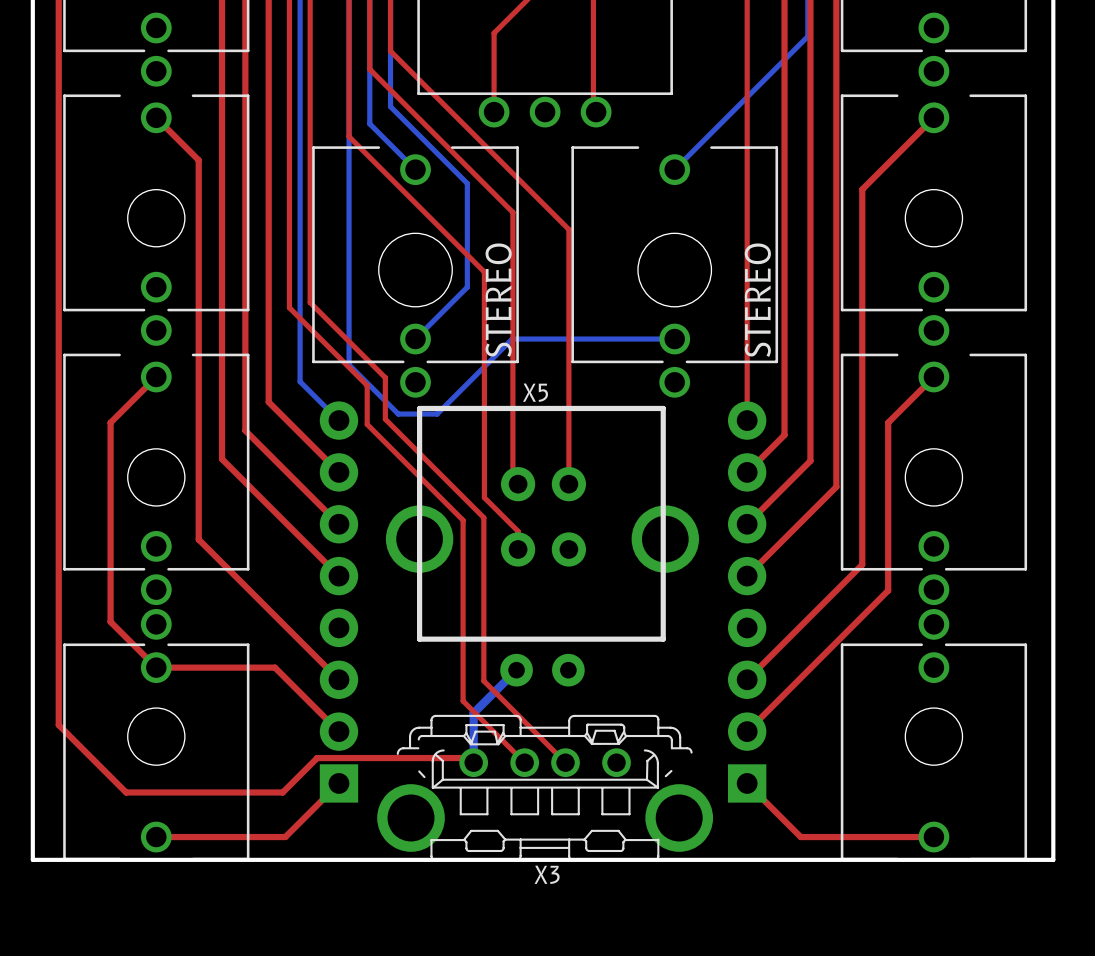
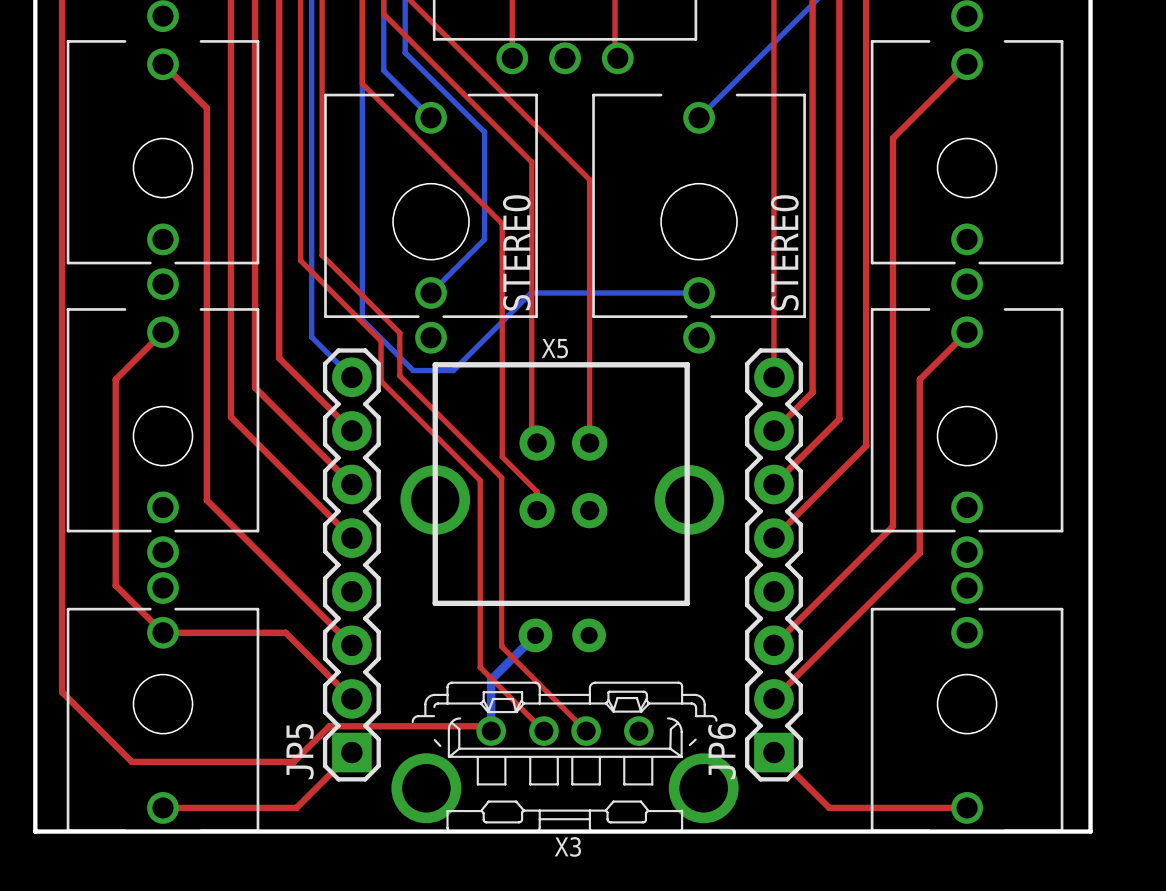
JP5 side: bottom (338, 602) -> top (351, 564)
JP6 side: bottom (747, 602) -> top (773, 564)

